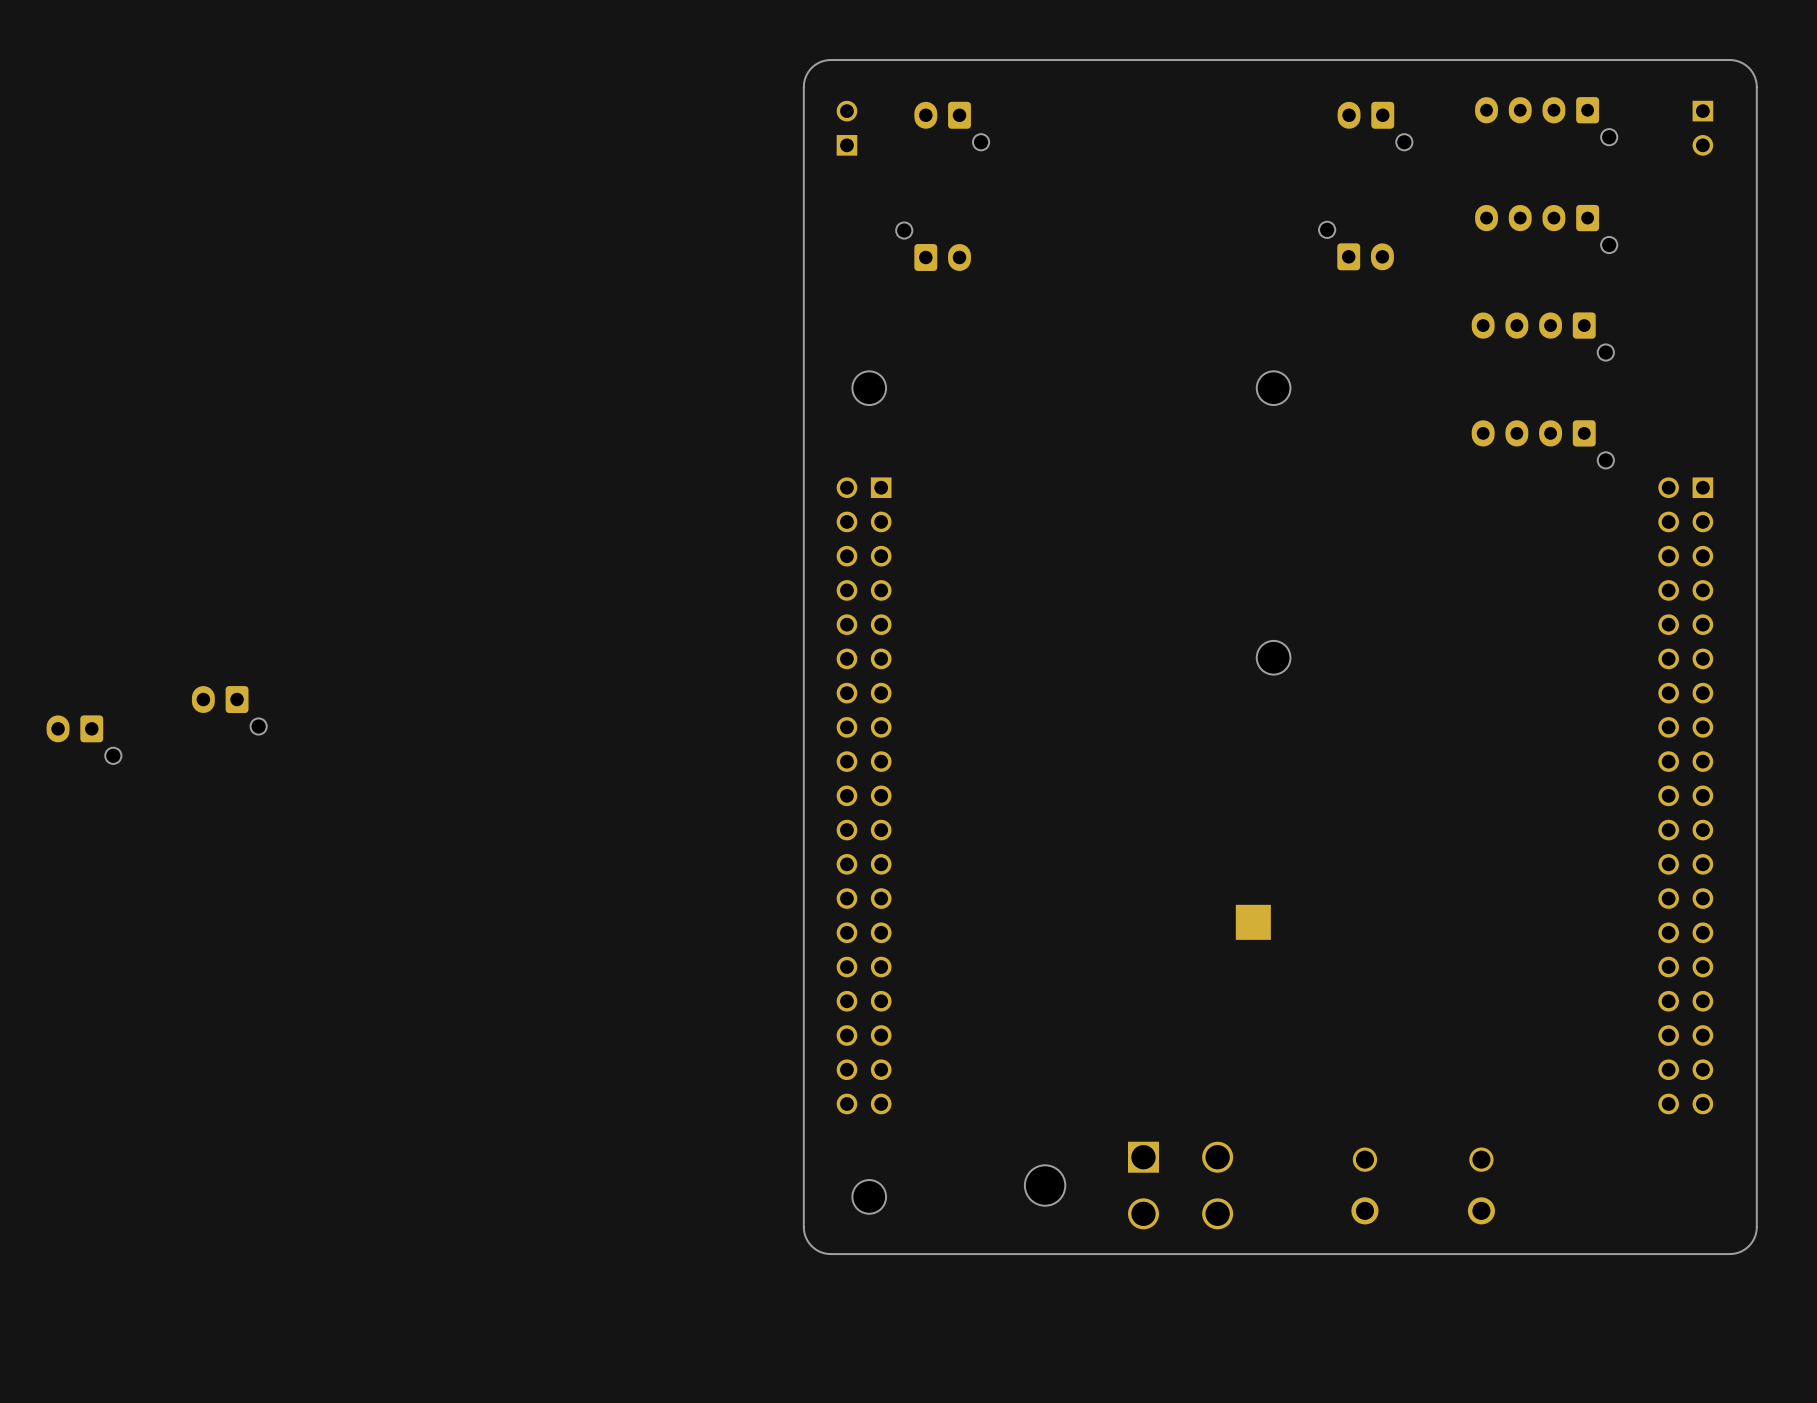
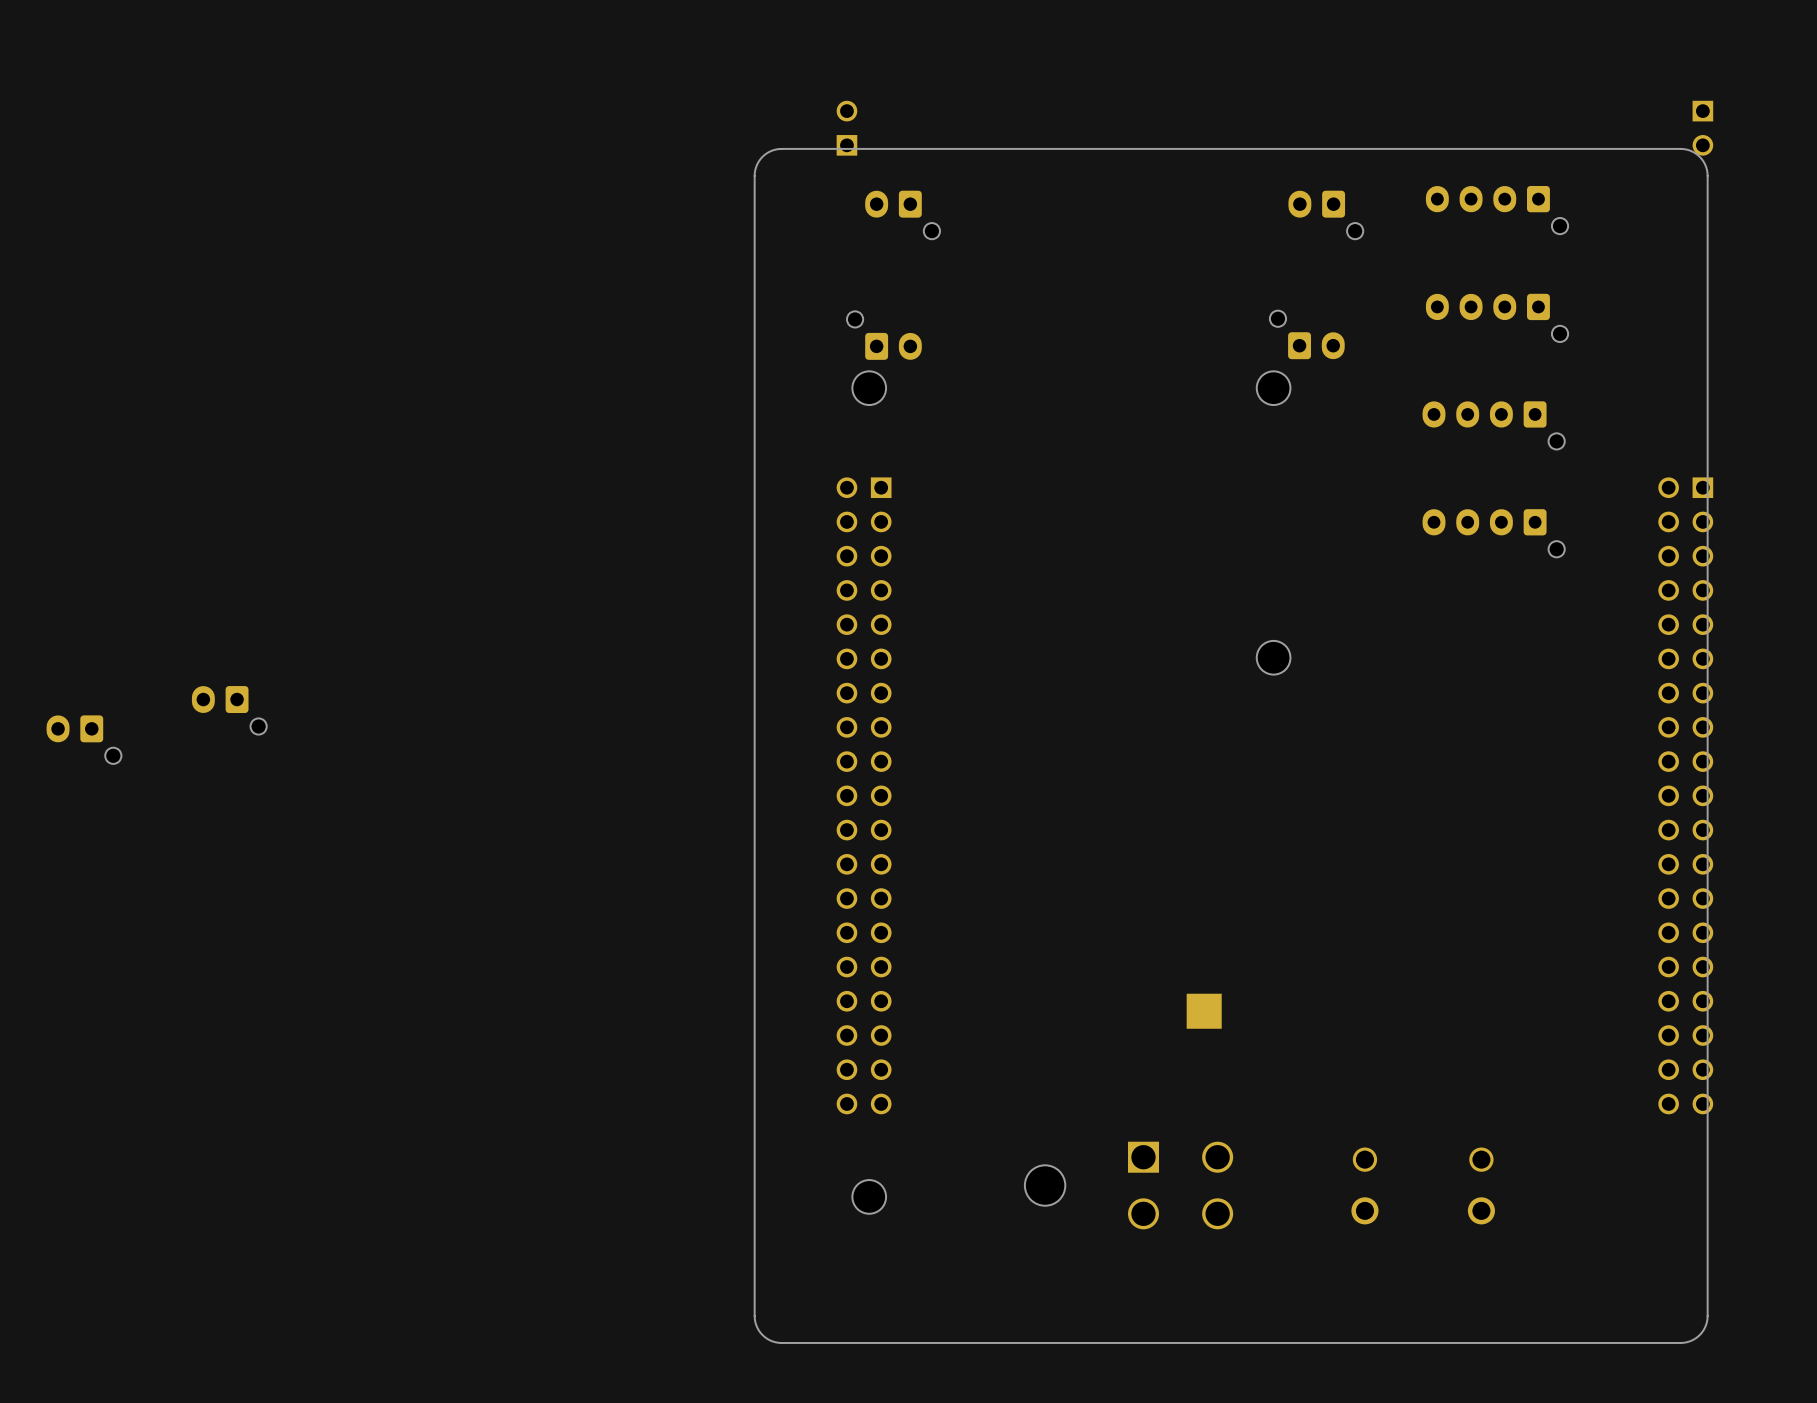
board edge: (1729, 60) (830, 60) (819, 62) (809, 70) (805, 78) (803, 86) (803, 1227) (806, 1238) (813, 1248) (821, 1252) (830, 1254) (1729, 1254) (1741, 1251) (1750, 1243) (1755, 1236) (1756, 1227) (1756, 86) (1754, 75) (1748, 67) (1741, 62) (1729, 60) -> (781, 1342) (1680, 1342) (1692, 1340) (1701, 1332) (1706, 1324) (1707, 1316) (1707, 175) (1704, 164) (1697, 154) (1689, 150) (1680, 148) (781, 148) (769, 151) (760, 159) (756, 166) (754, 175) (754, 1316) (757, 1327) (762, 1335) (769, 1340) (781, 1342)
part: (1546, 121) -> none
part: (951, 126) -> none
part: (1375, 126) -> none
part: none -> (1497, 210)
part: (1546, 229) -> none
part rotation: 0° (933, 246) -> 180° (902, 214)
part rotation: 0° (1356, 246) -> 180° (1325, 214)
part: none -> (1307, 334)
part: none -> (884, 335)
part position: (1542, 336) -> (1497, 317)
part: none -> (1493, 425)
part: (1542, 444) -> none
part: none -> (1493, 533)
part position: (1253, 922) -> (1204, 1011)

